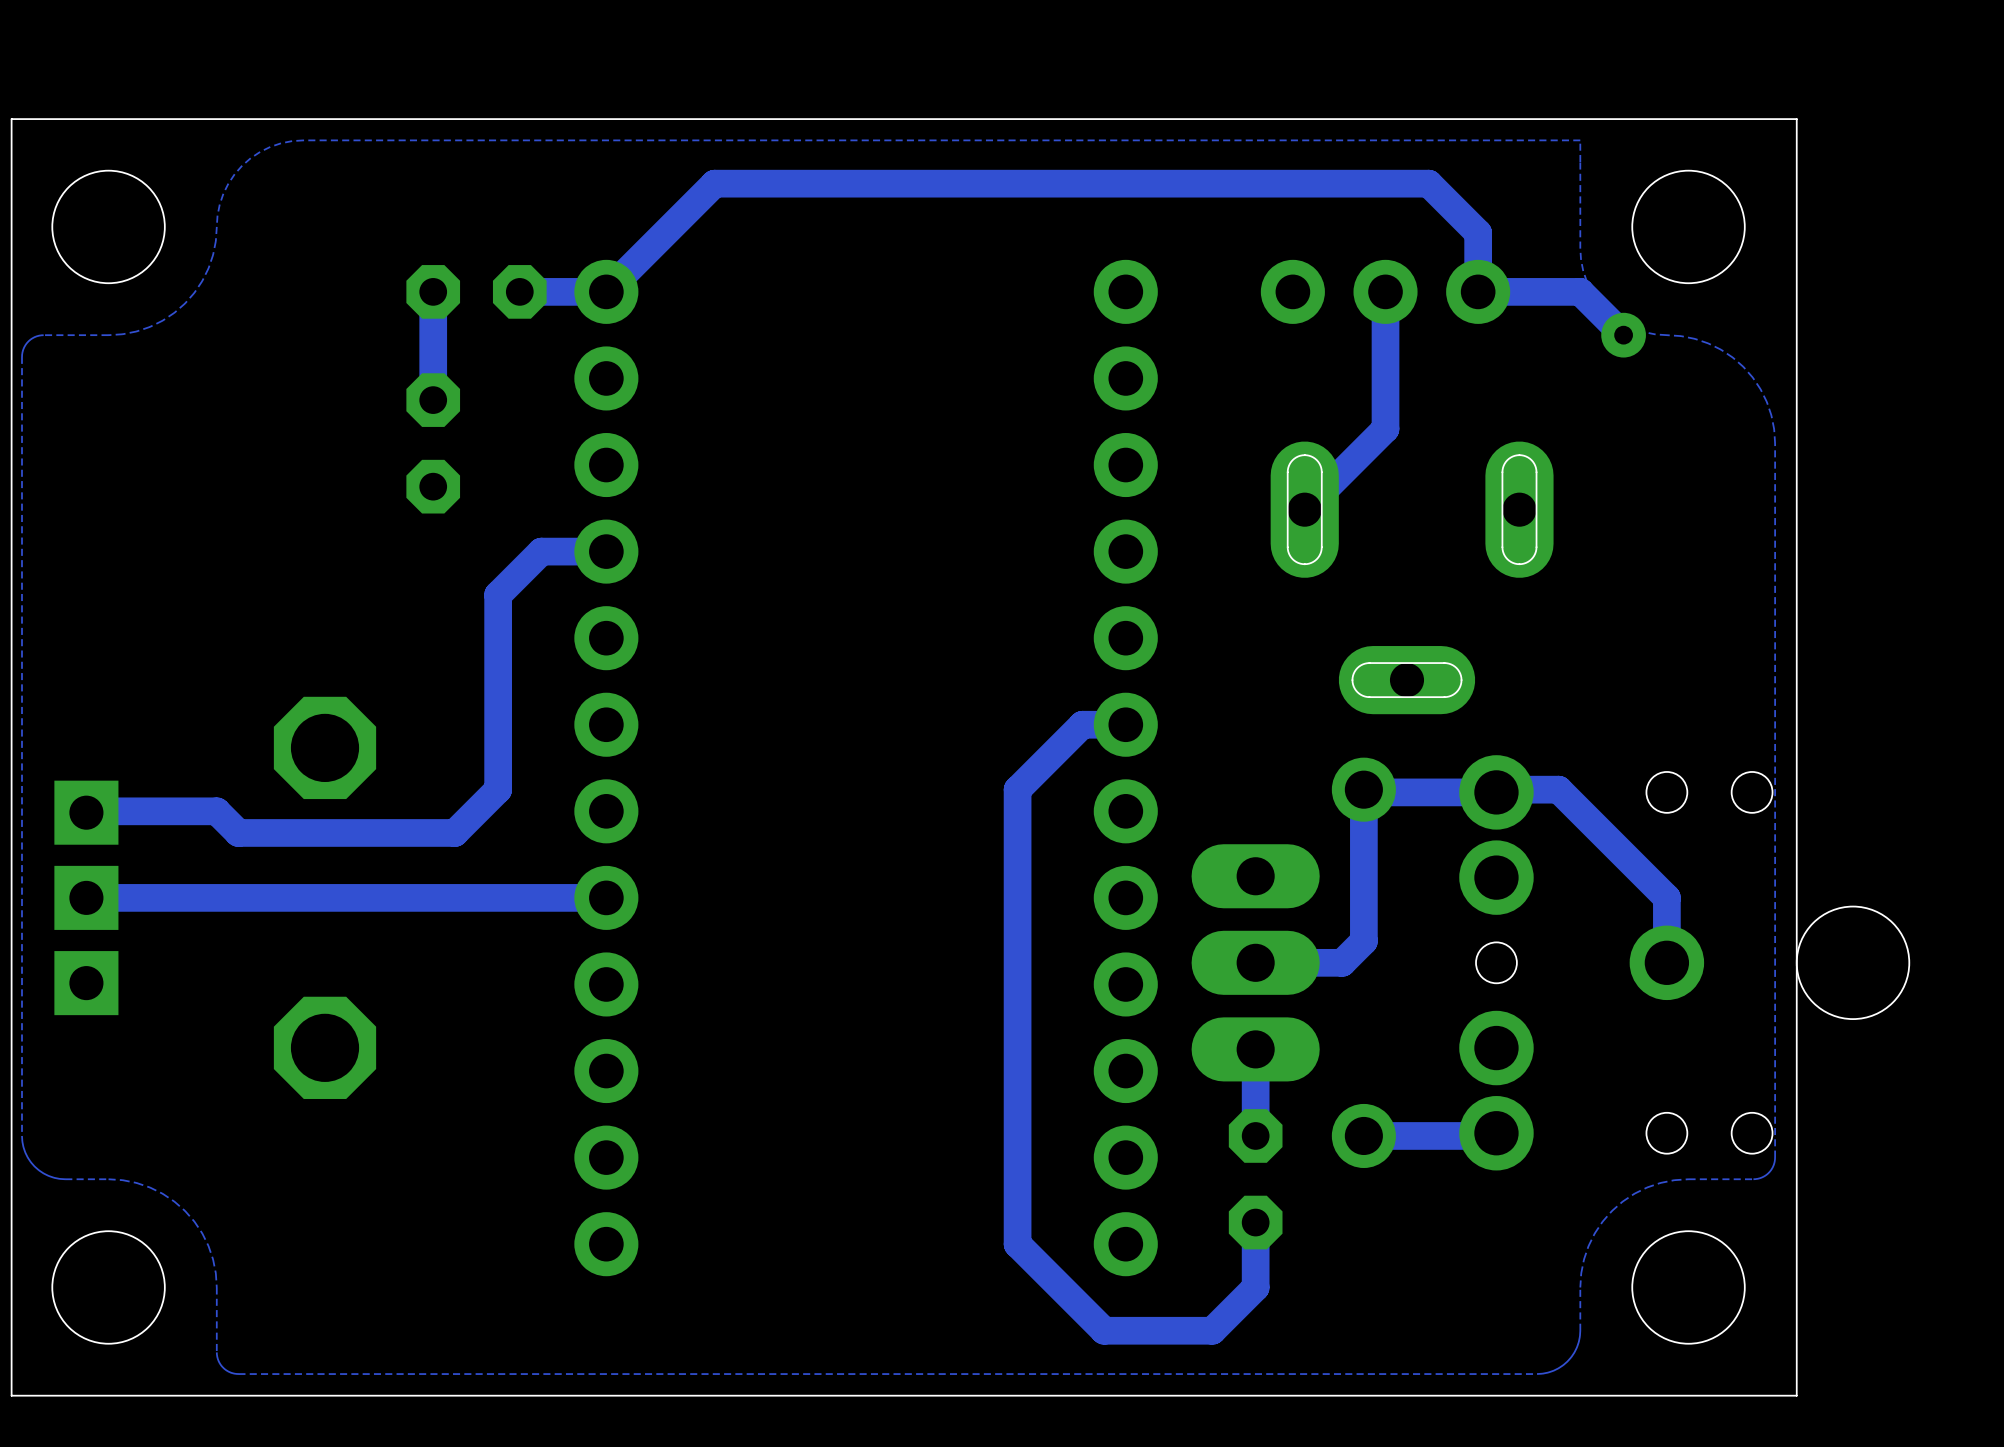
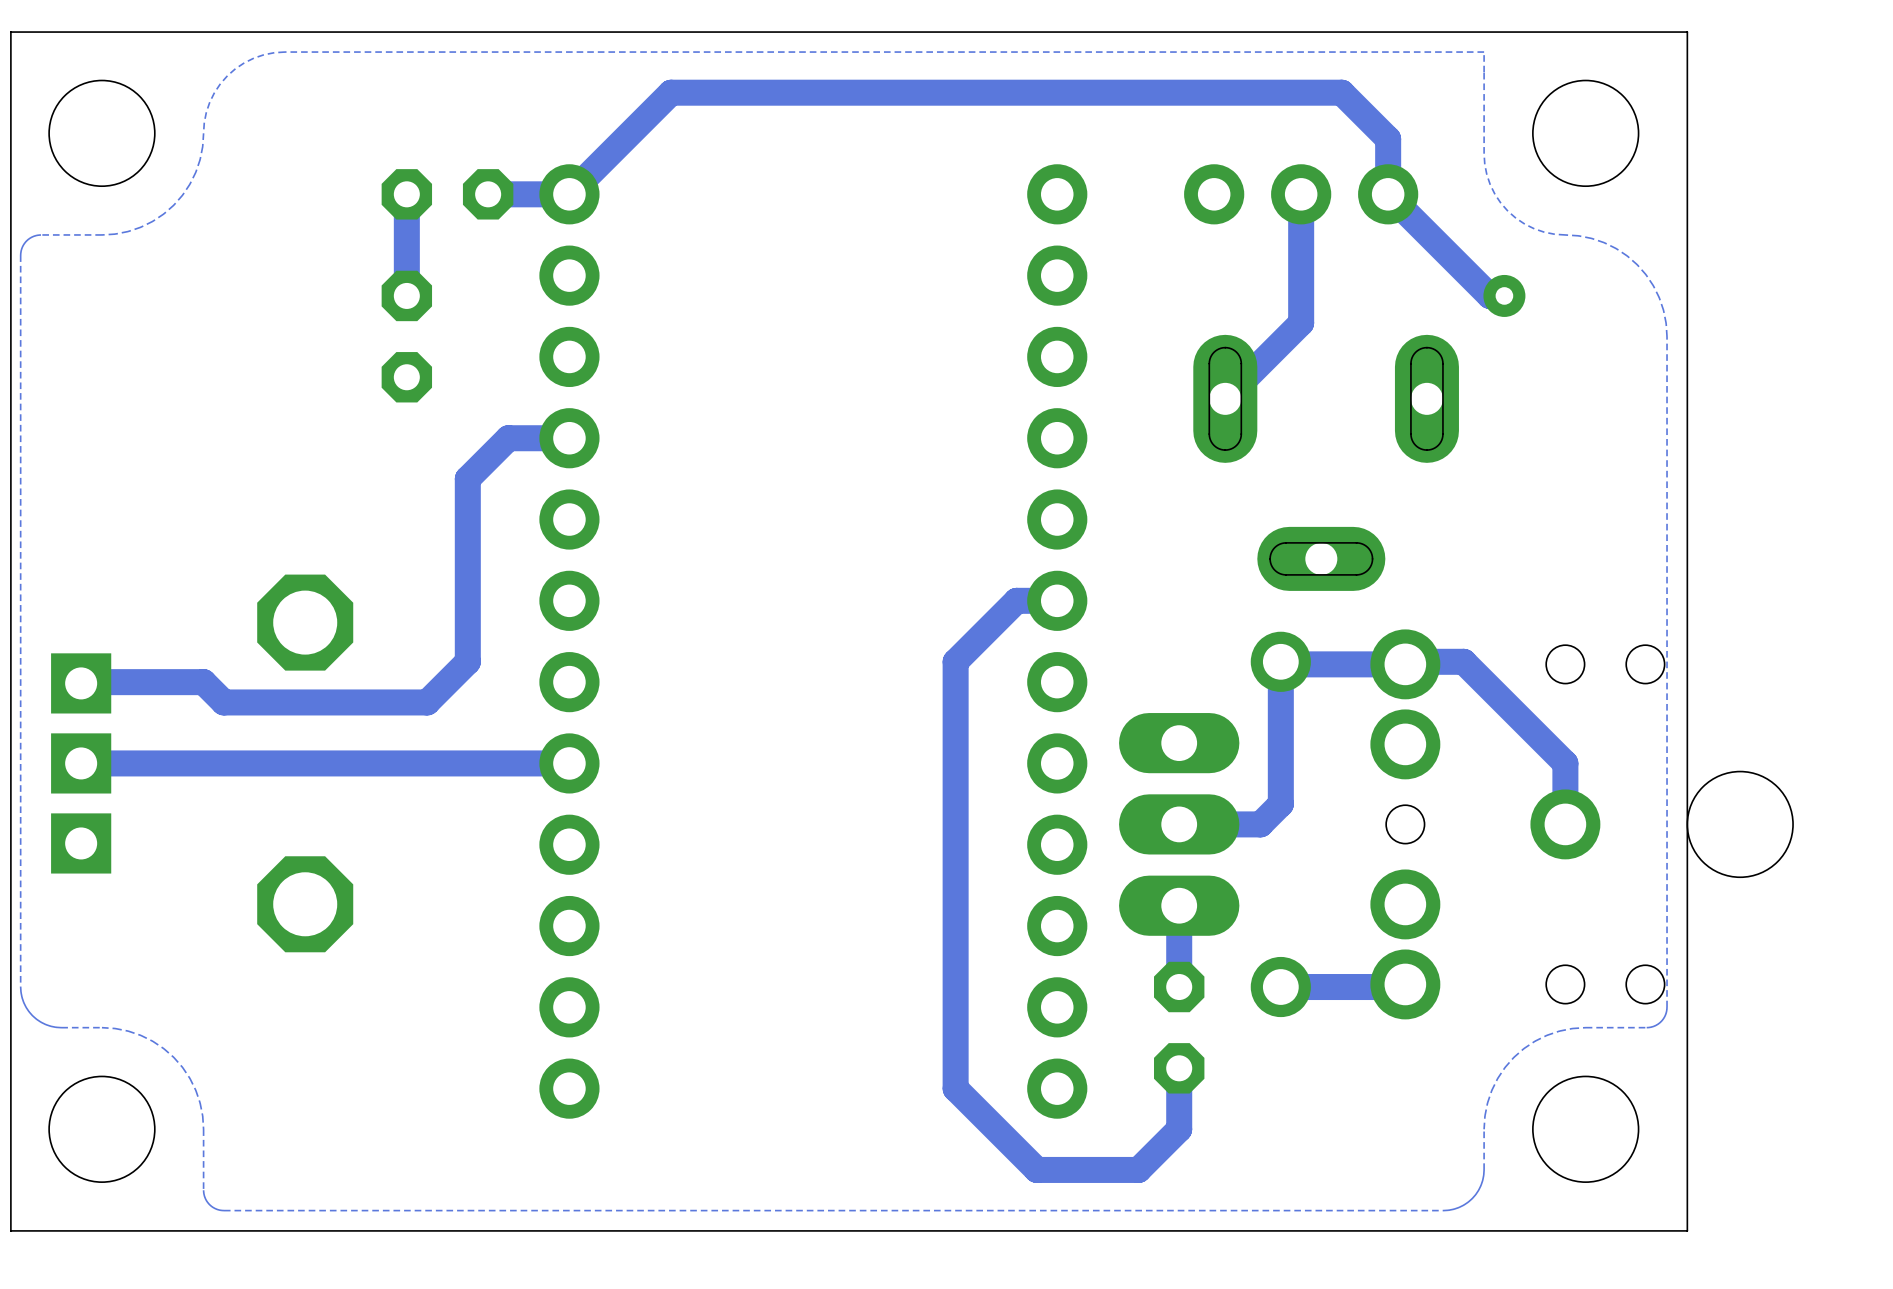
track: (1478, 291) (1580, 291) (1623, 335) -> (1388, 194) (1489, 295) (1504, 295)
via position: (1623, 335) -> (1504, 295)

